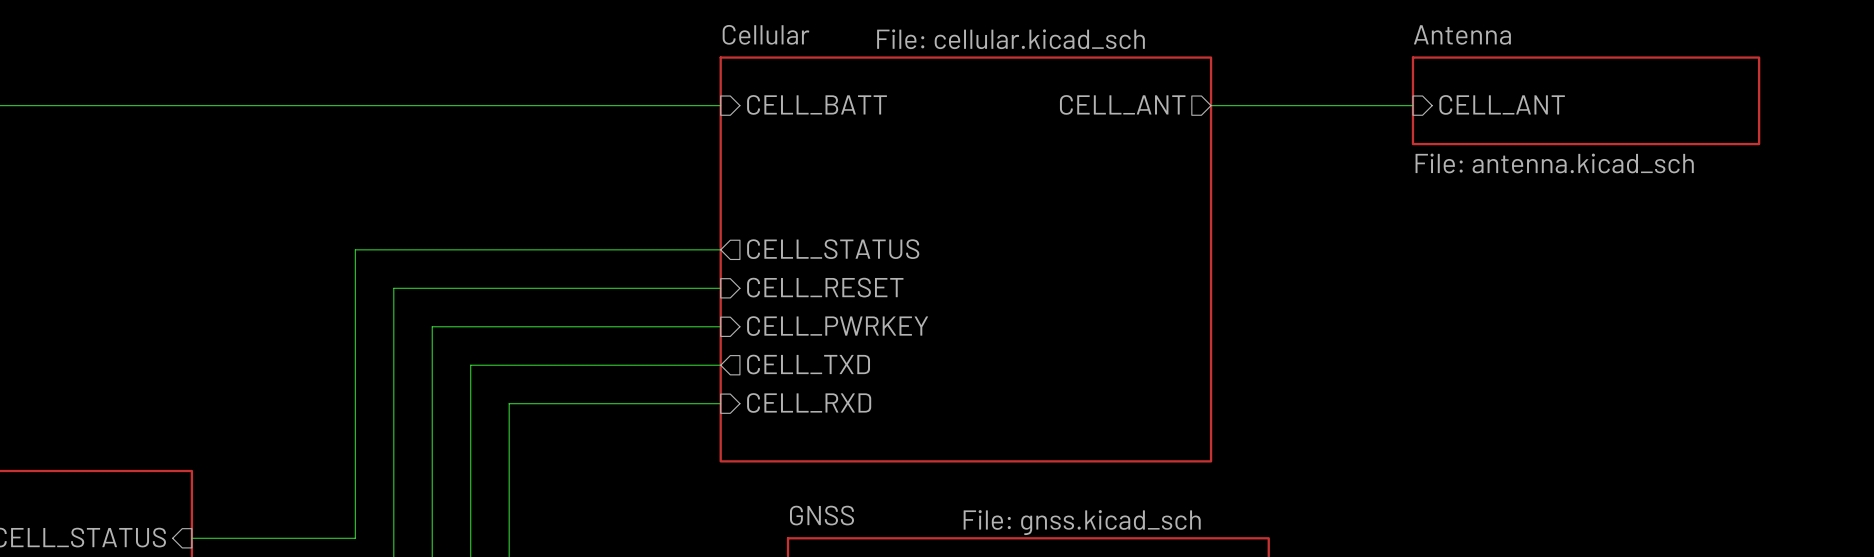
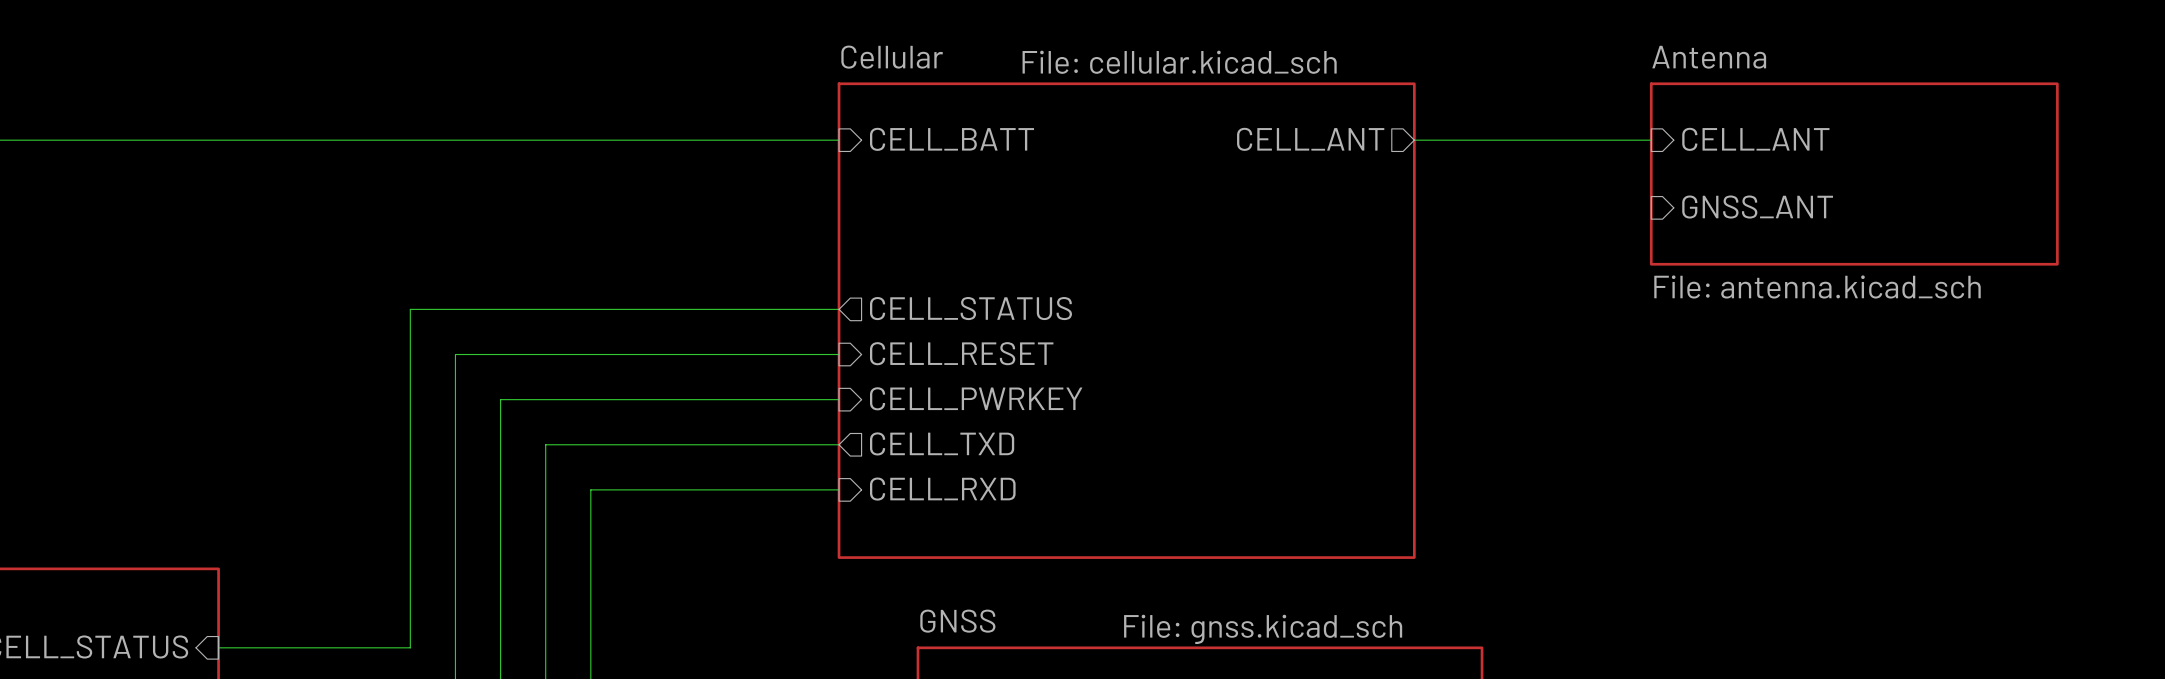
sheet Antenna: File: antenna.kicad_sch (1586, 100) -> none
sheet Antenna: none -> File: antenna.kicad_sch (1854, 174)
sheet pin: none -> GNSS_ANT (1757, 207)

